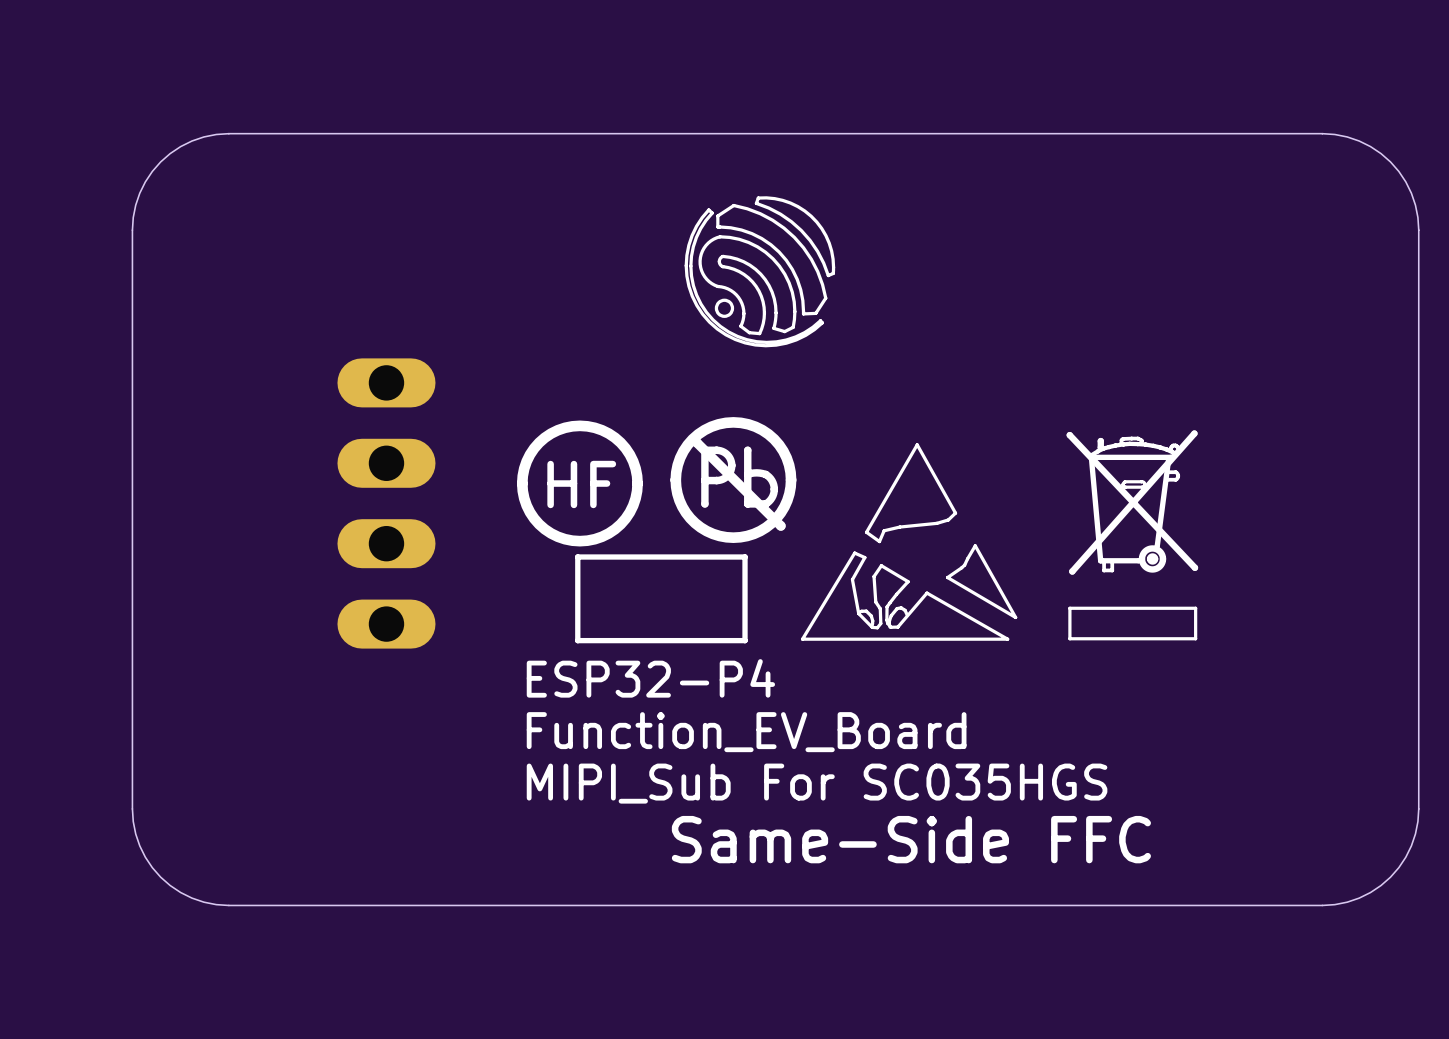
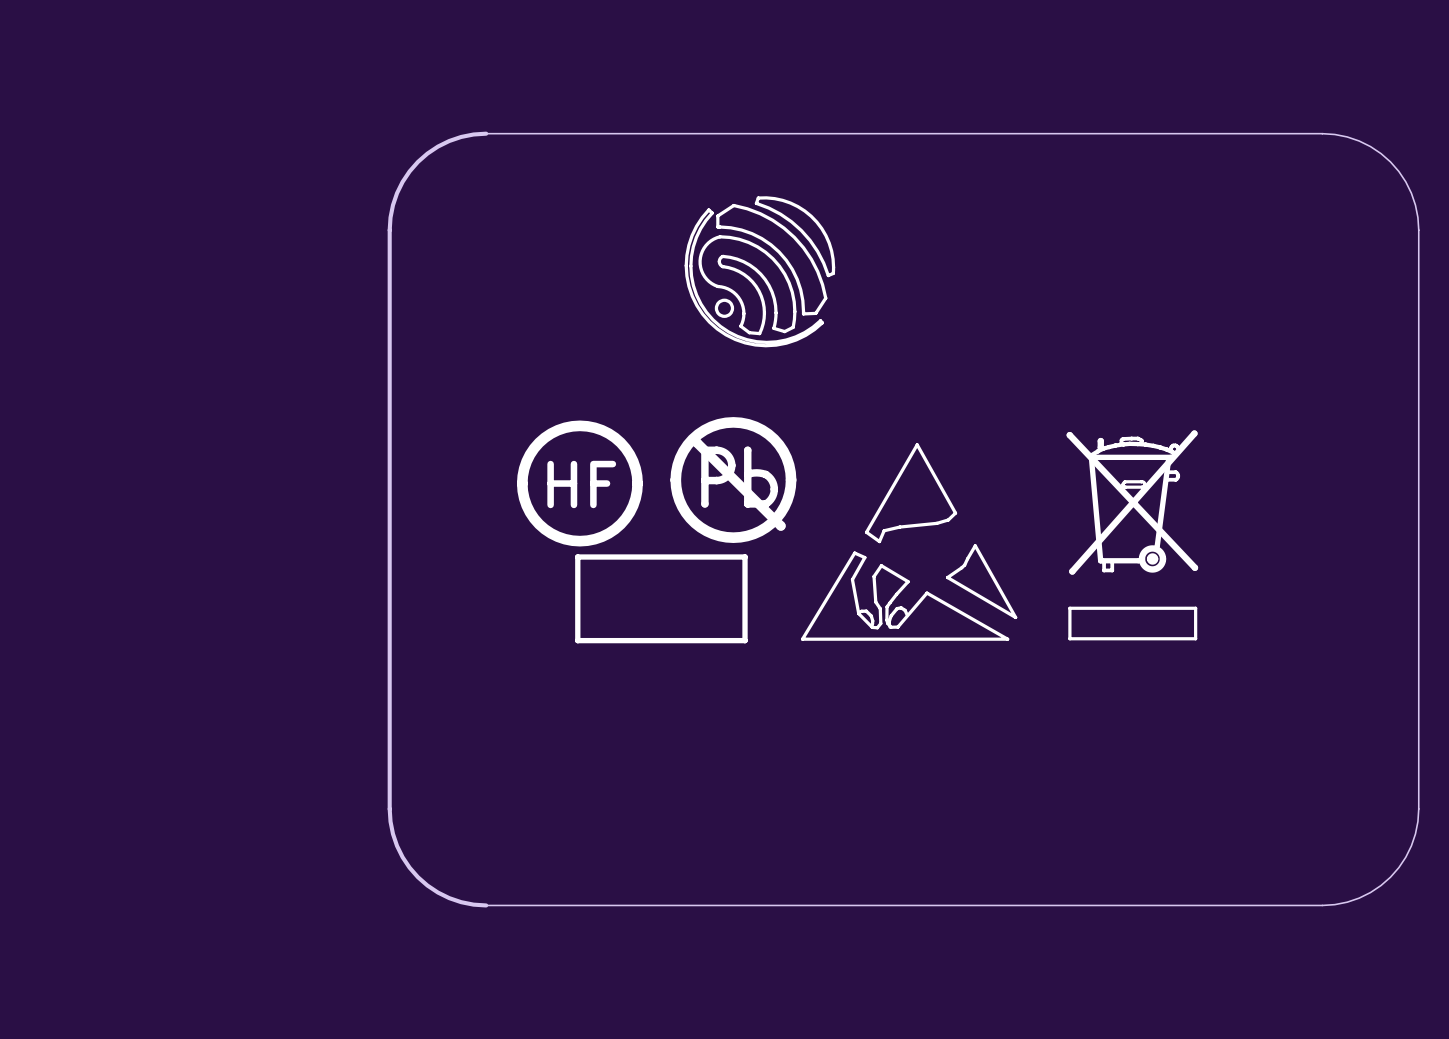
board edge: (486, 133) (228, 133) (203, 136) (191, 141) (170, 153) (152, 171) (145, 181) (135, 205) (132, 230) (132, 808) (135, 833) (145, 857) (152, 867) (170, 885) (191, 898) (216, 904) (486, 905) -> (486, 133) (461, 136) (449, 141) (437, 146) (417, 161) (409, 171) (397, 193) (390, 217) (389, 230) (390, 821) (397, 845) (402, 857) (417, 877) (427, 885) (437, 892) (461, 902) (486, 905)
part: (386, 503) -> none
text: ESP32-P4 (650, 678) -> none
text: Function_EV_Board (746, 732) -> none
text: MIPI_Sub For SC035HGS (817, 783) -> none
text: Same-Side FFC (911, 839) -> none

